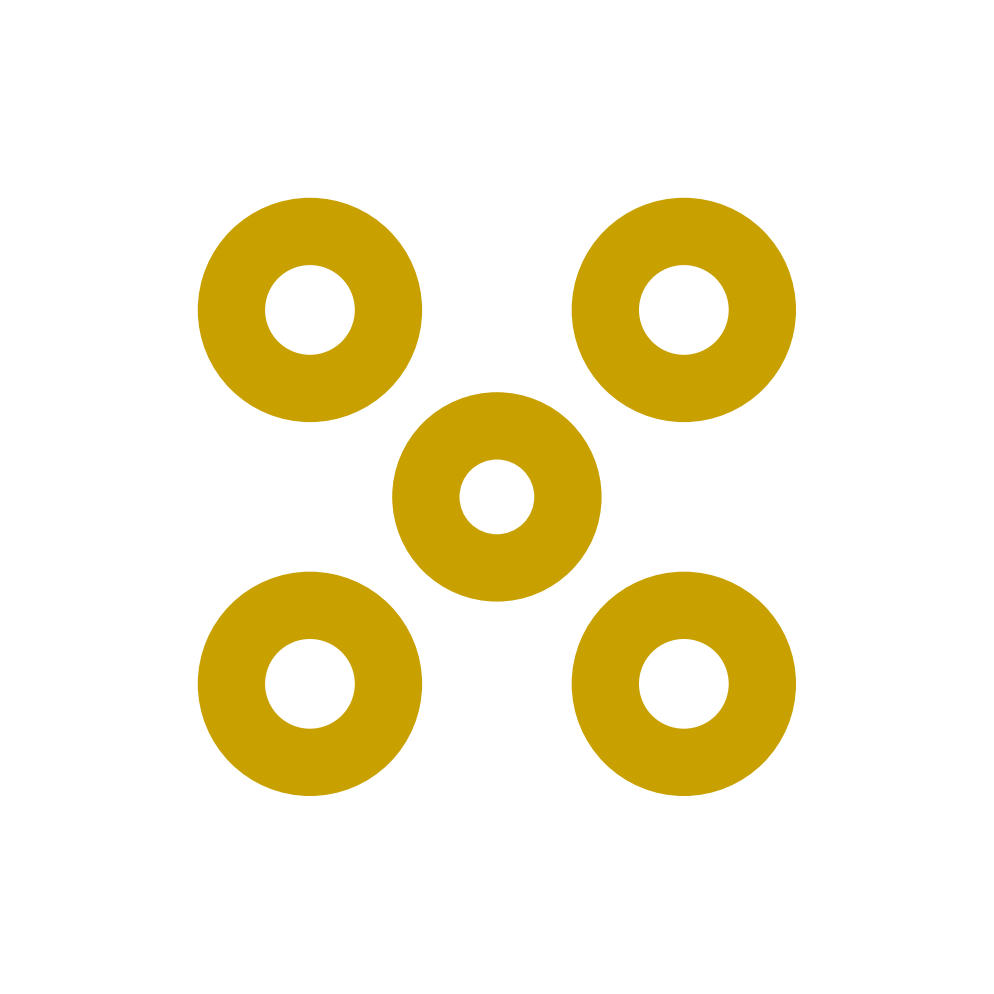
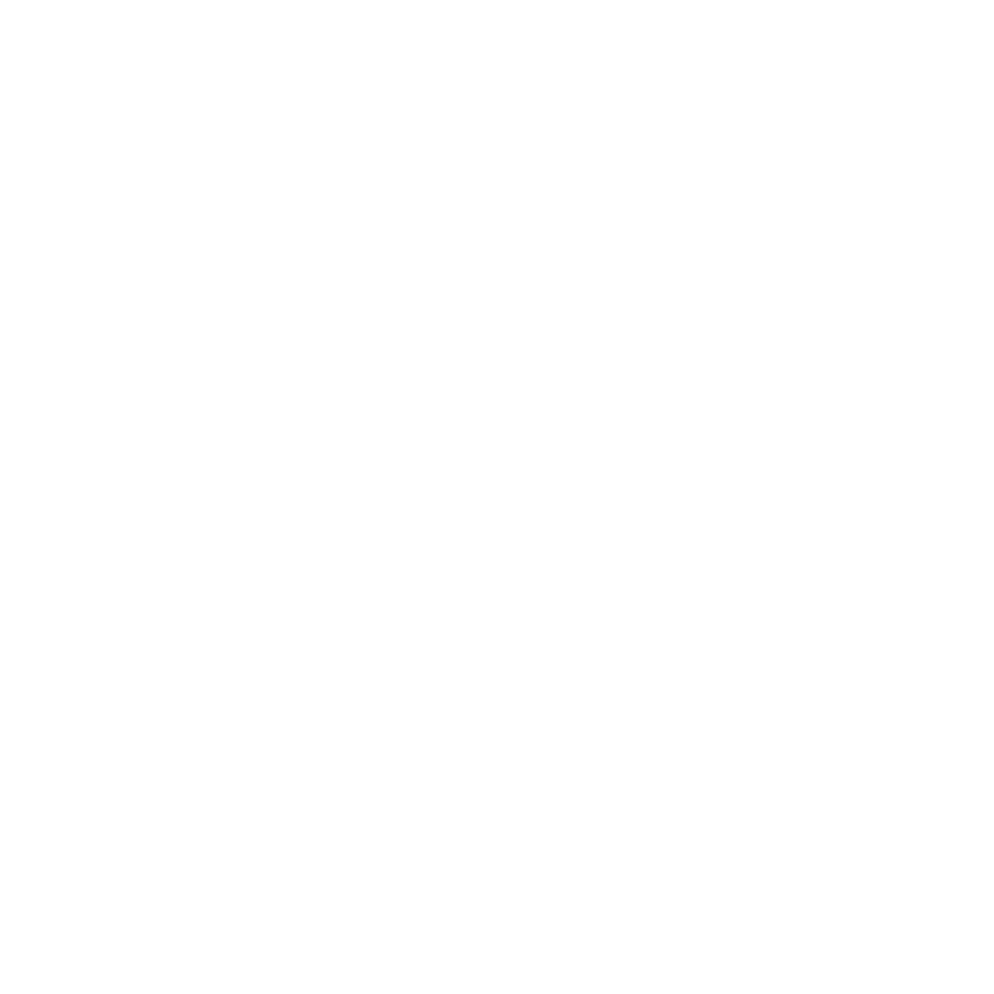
part: (496, 496) -> none

